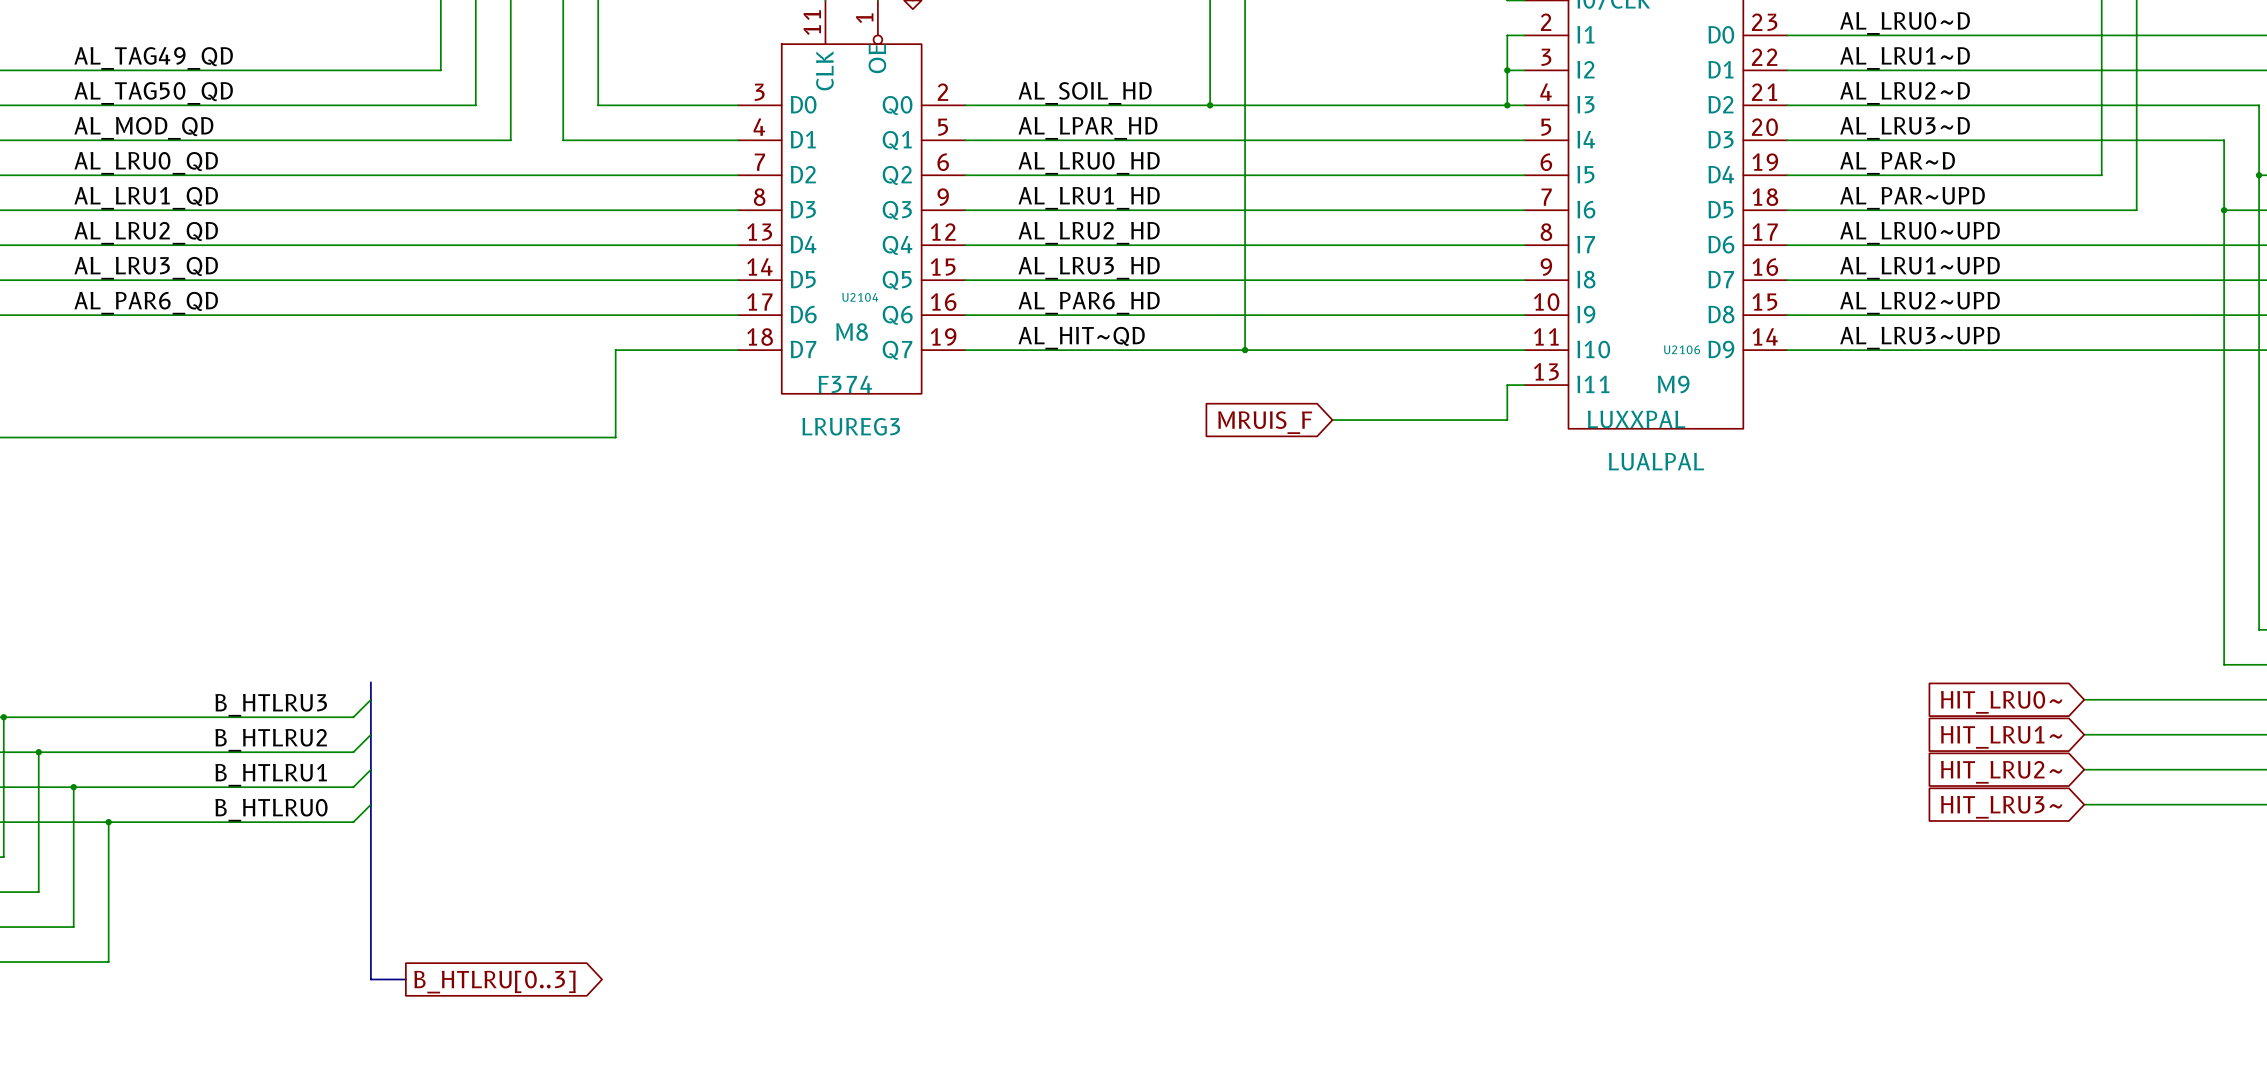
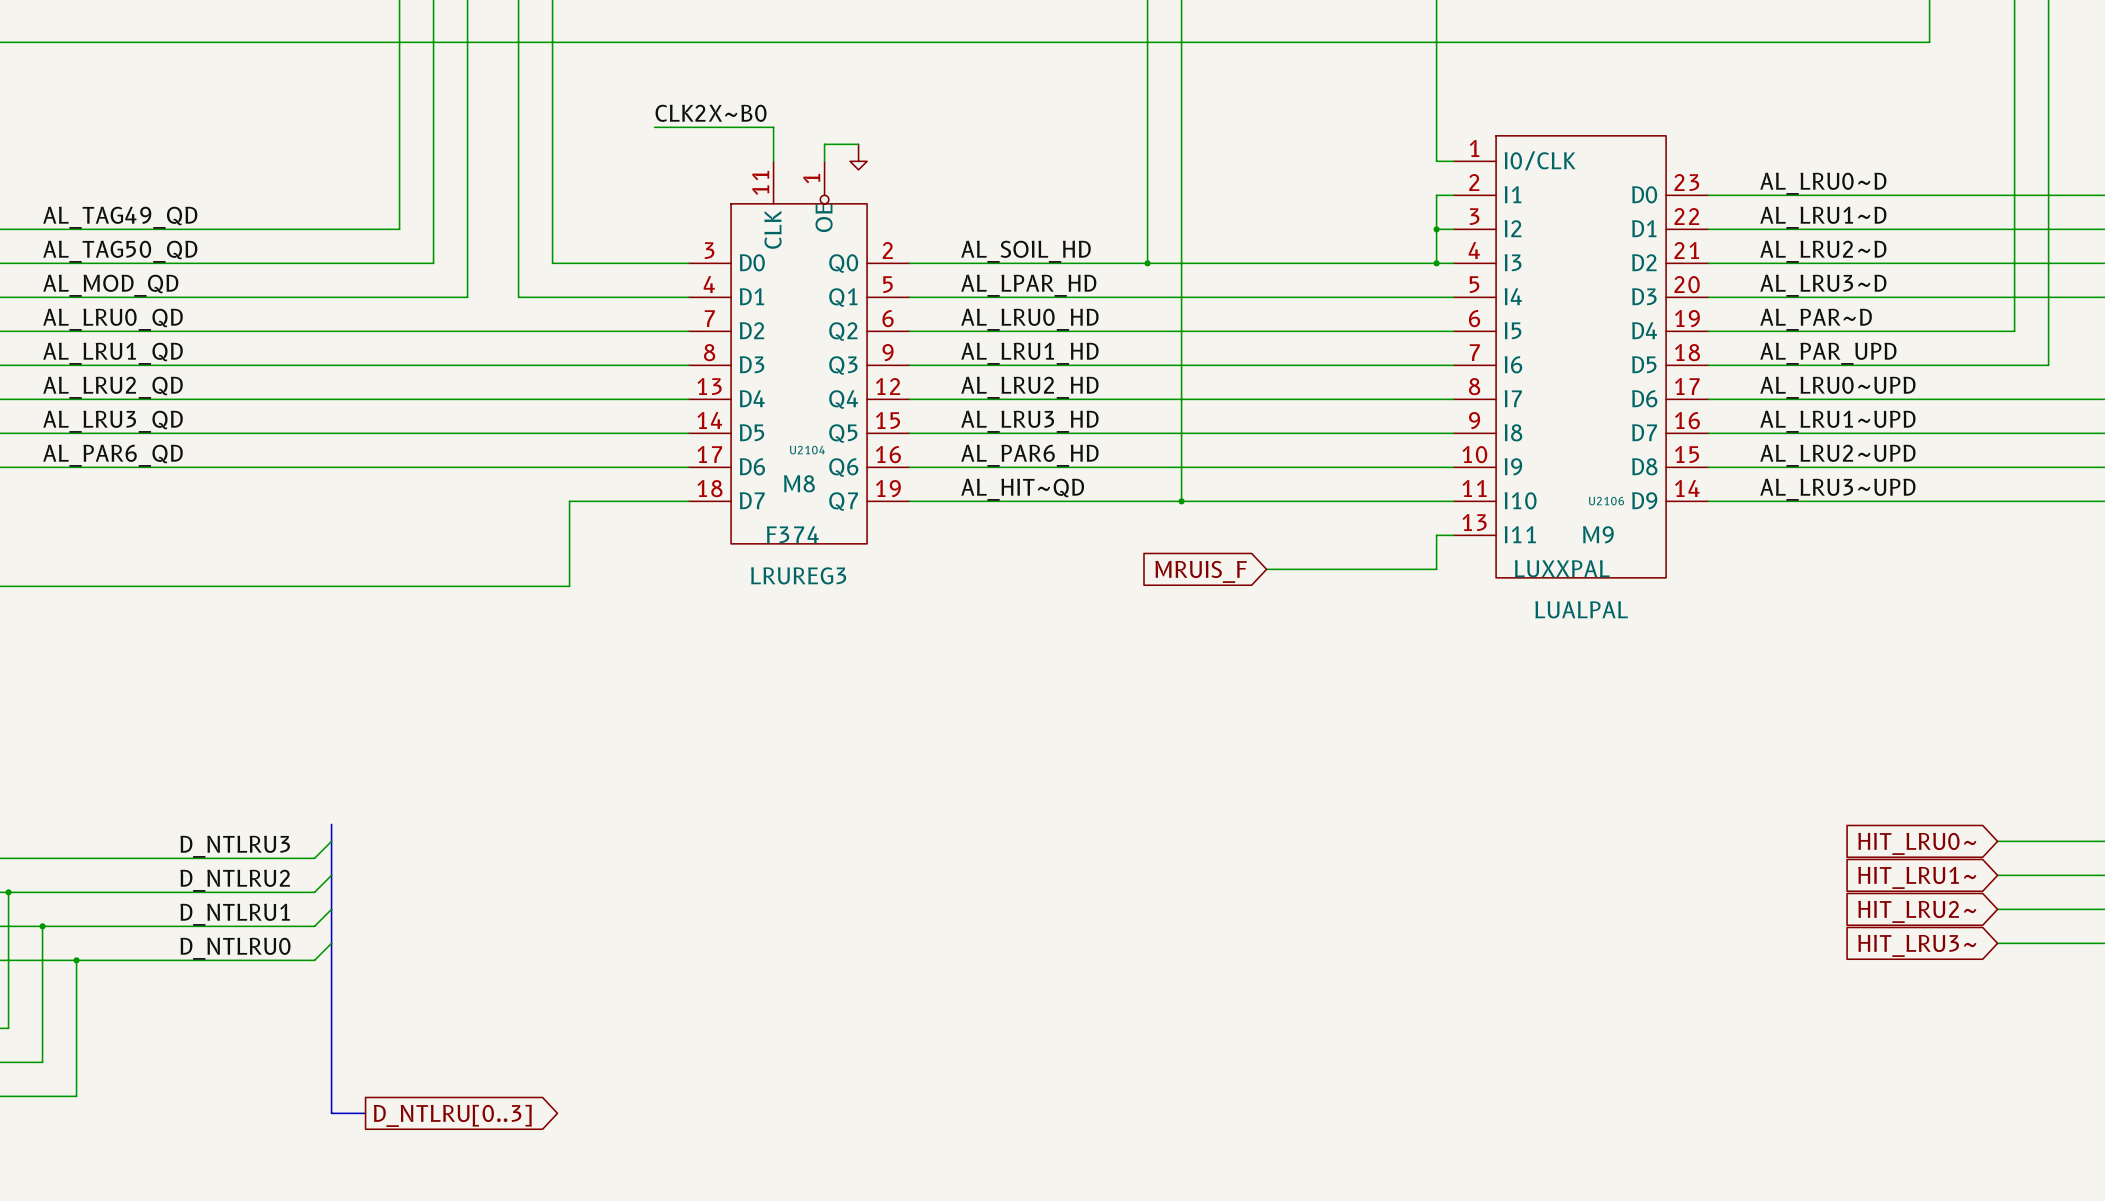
label: AL_PAR~UPD (1912, 198) -> AL_PAR_UPD (1828, 353)
label: B_HTLRU3 (271, 705) -> D_NTLRU3 (235, 846)
label: B_HTLRU2 (271, 740) -> D_NTLRU2 (235, 880)
label: B_HTLRU1 (271, 775) -> D_NTLRU1 (235, 914)
label: B_HTLRU0 (271, 810) -> D_NTLRU0 (235, 948)
global label: B_HTLRU[0..3] (495, 982) -> D_NTLRU[0..3] (452, 1115)

